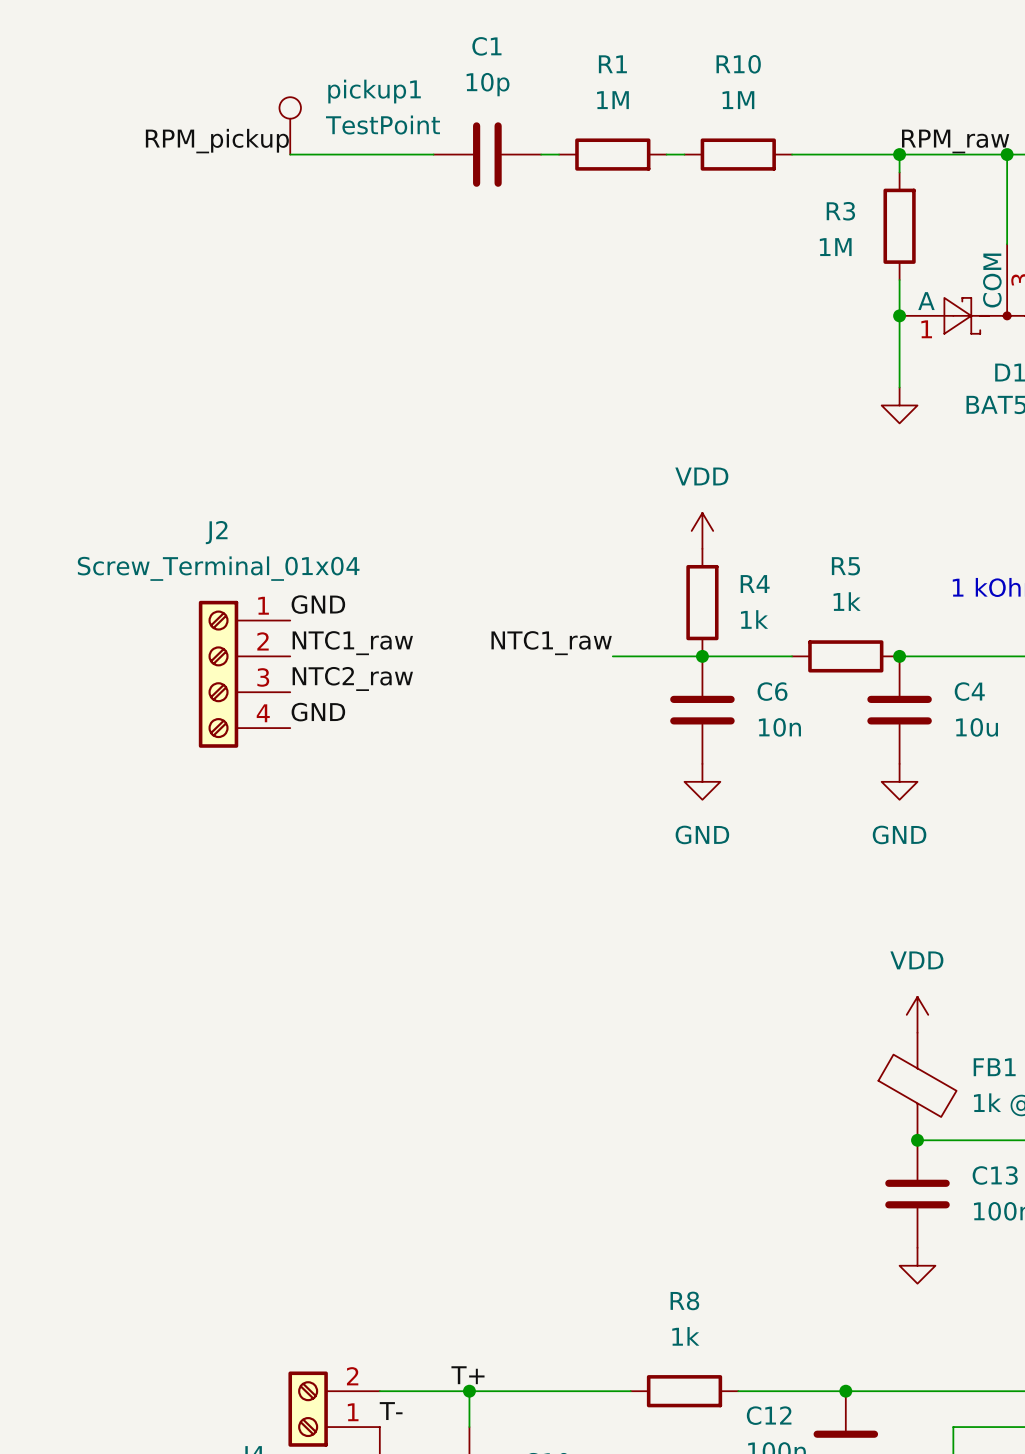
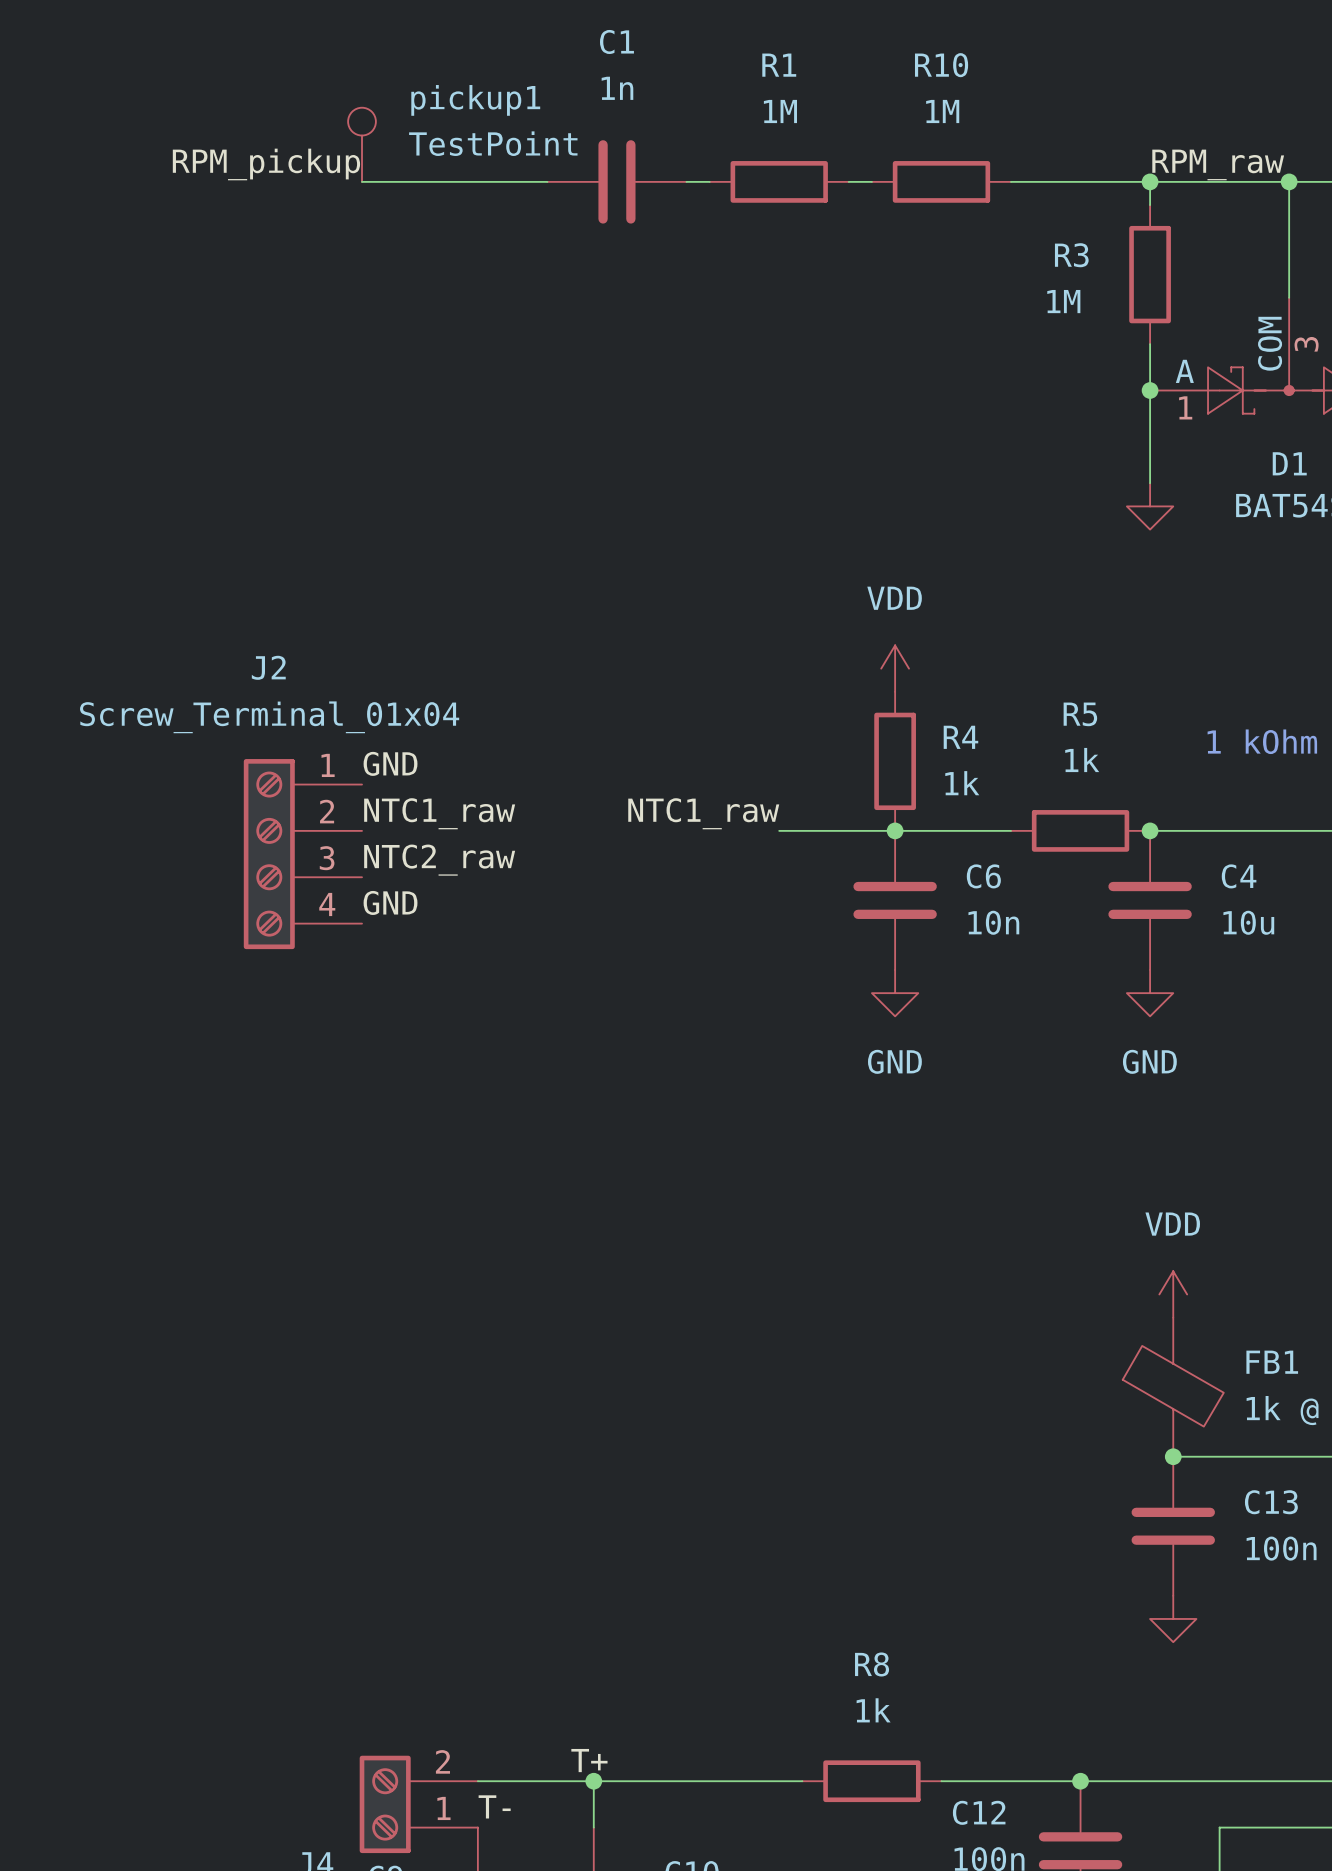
C1 value: 10p (488, 84) -> 1n (617, 88)

